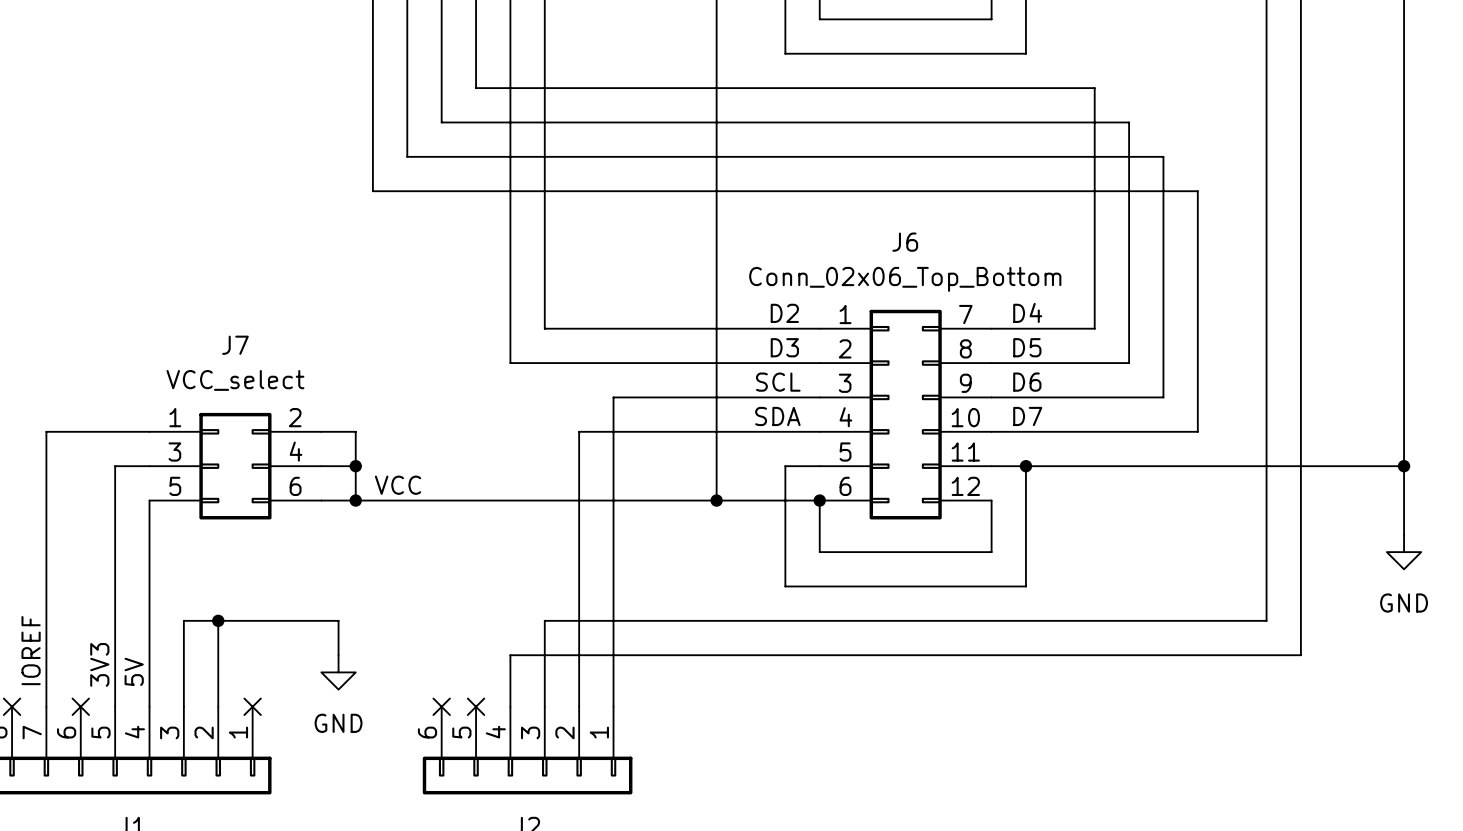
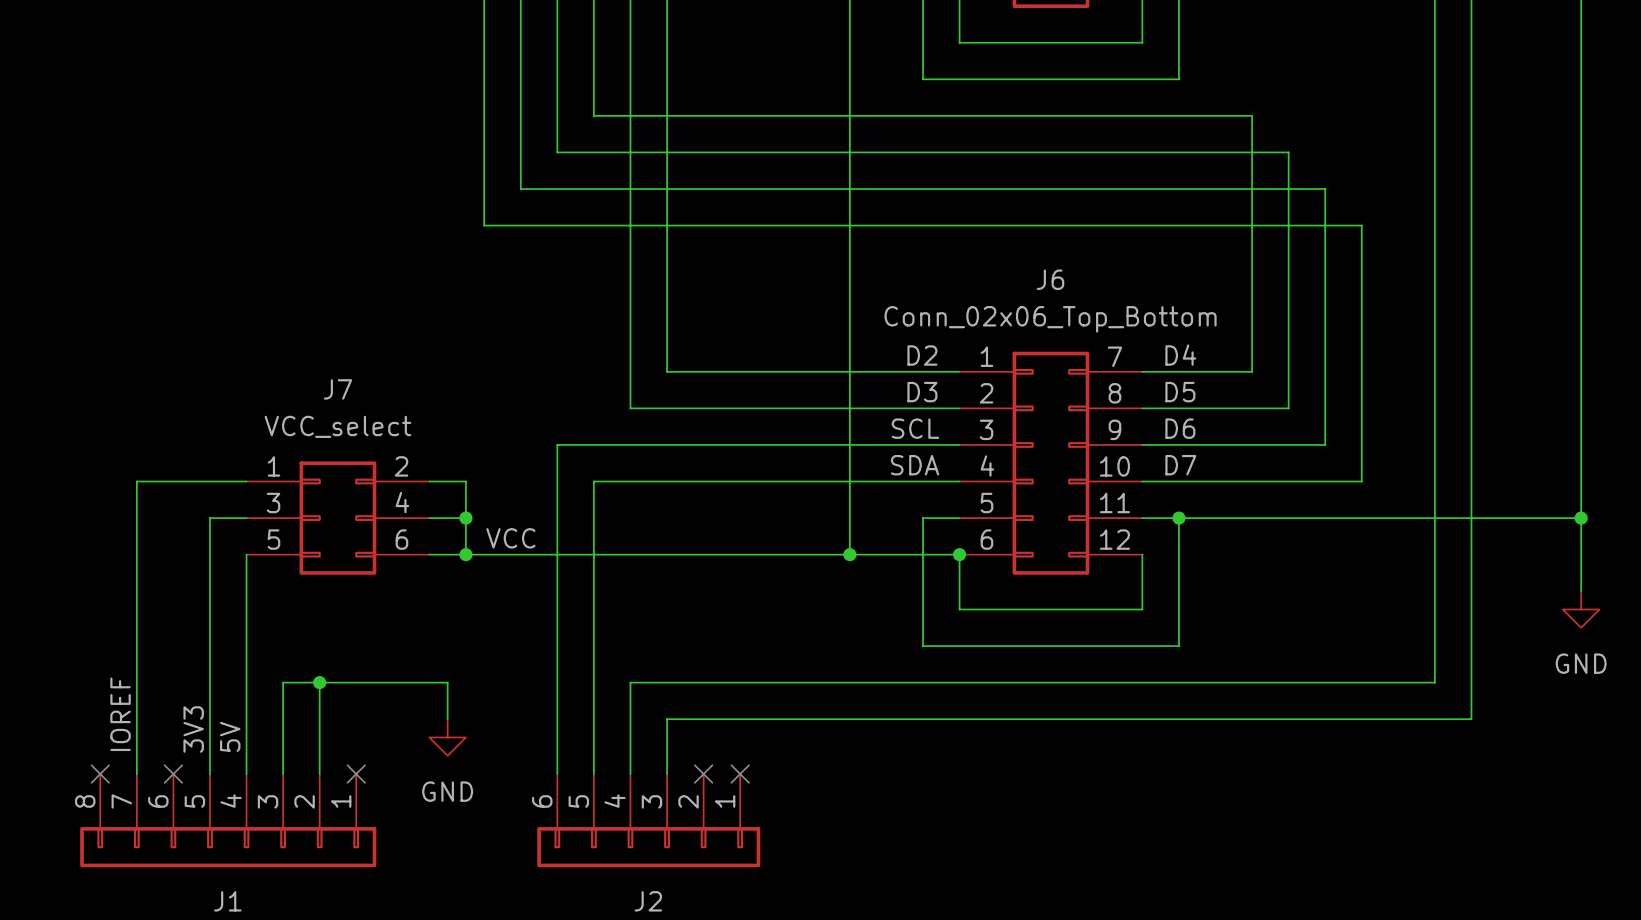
wire: (613, 397) (613, 706) -> (740, 444) (557, 444) (557, 774)
wire: (579, 431) (579, 706) -> (703, 481) (593, 481) (593, 774)
wire: (544, 620) (544, 655) (510, 655) -> (667, 682) (630, 682) (630, 719)
no-connect mark: (441, 706) -> none
no-connect mark: (476, 706) -> none
no-connect mark: none -> (703, 774)
no-connect mark: none -> (740, 774)

